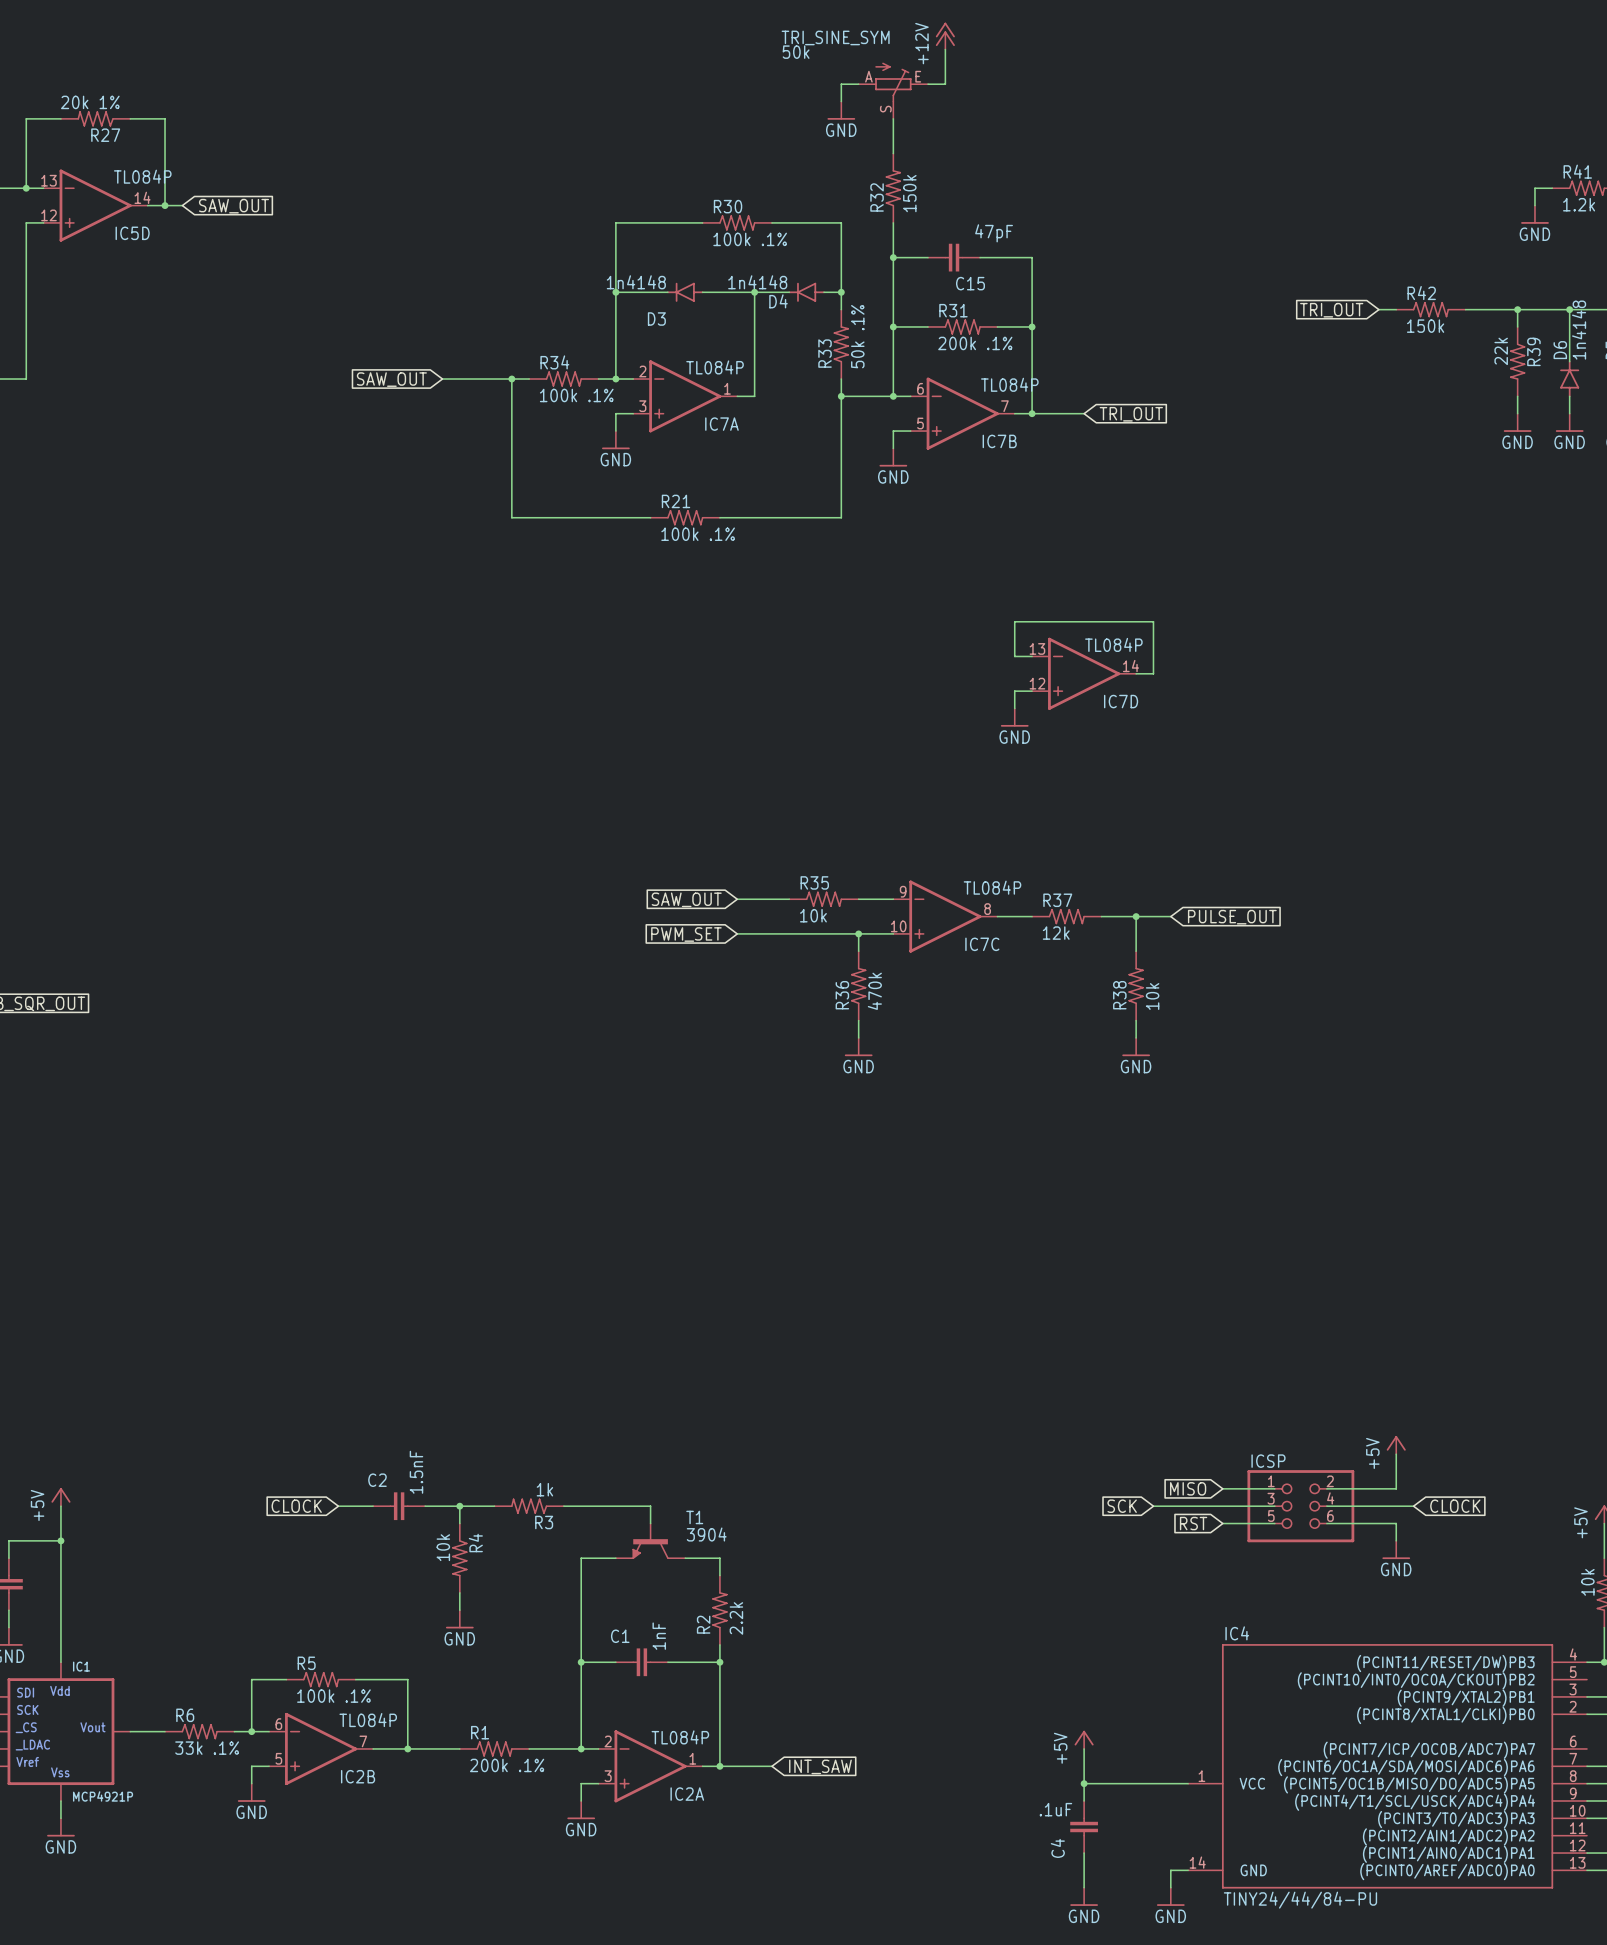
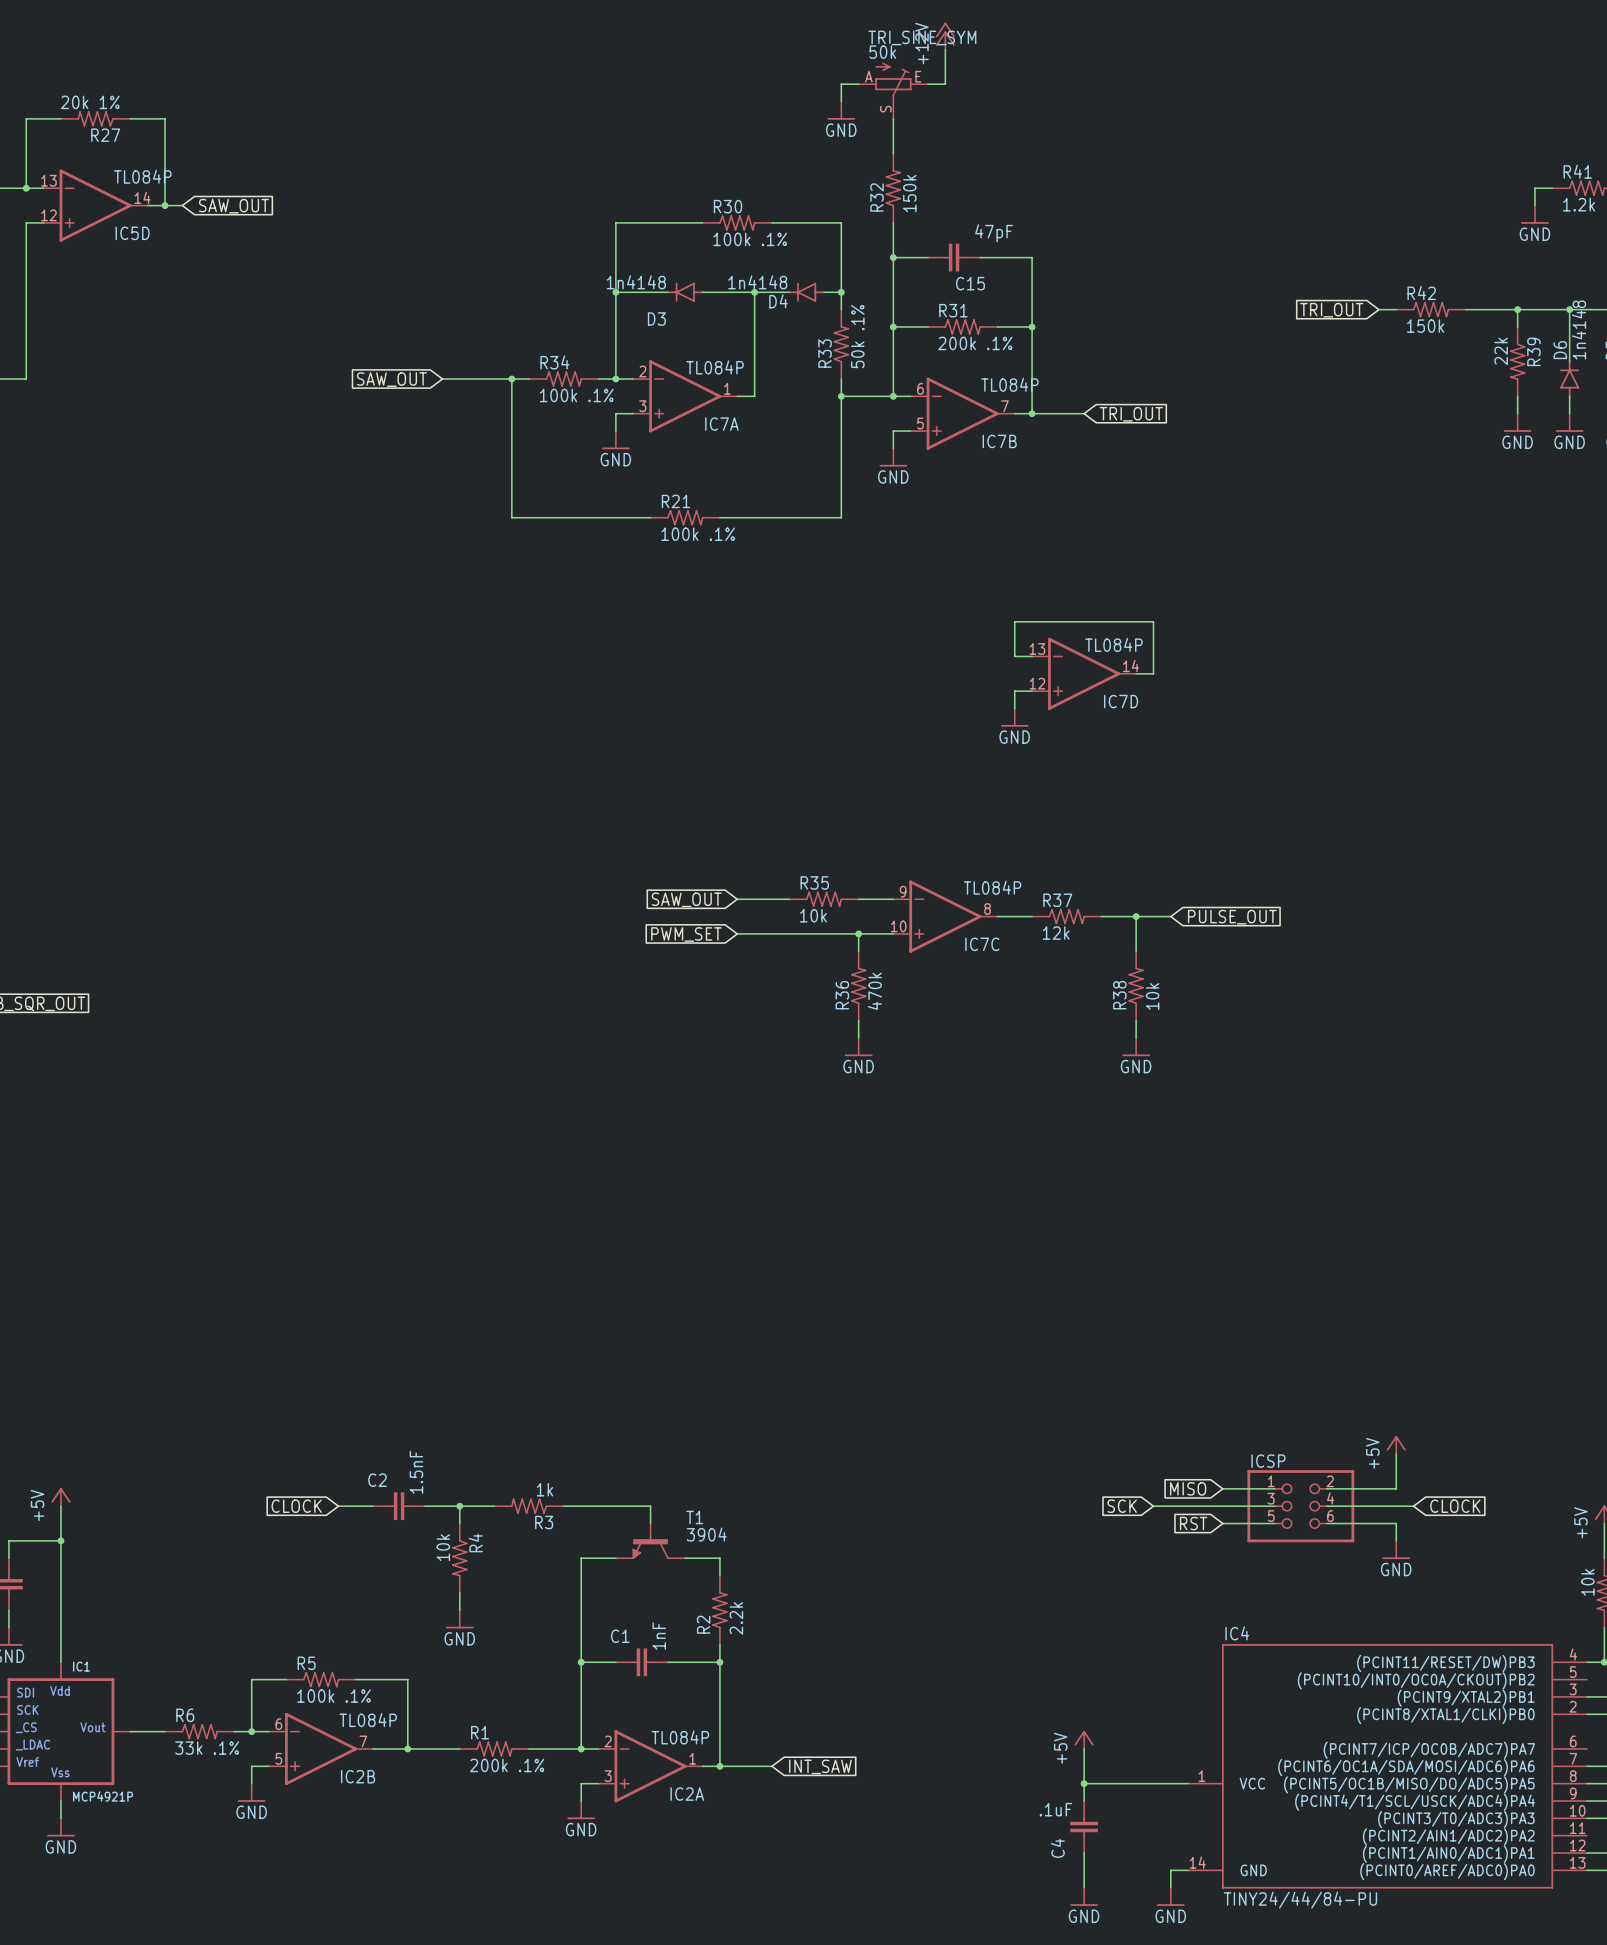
TRI_SINE_SYM name position: TRI_SINE_SYM (835, 37) -> TRI_SINE_SYM (922, 37)
TRI_SINE_SYM value position: 50k (796, 52) -> 50k (882, 52)

